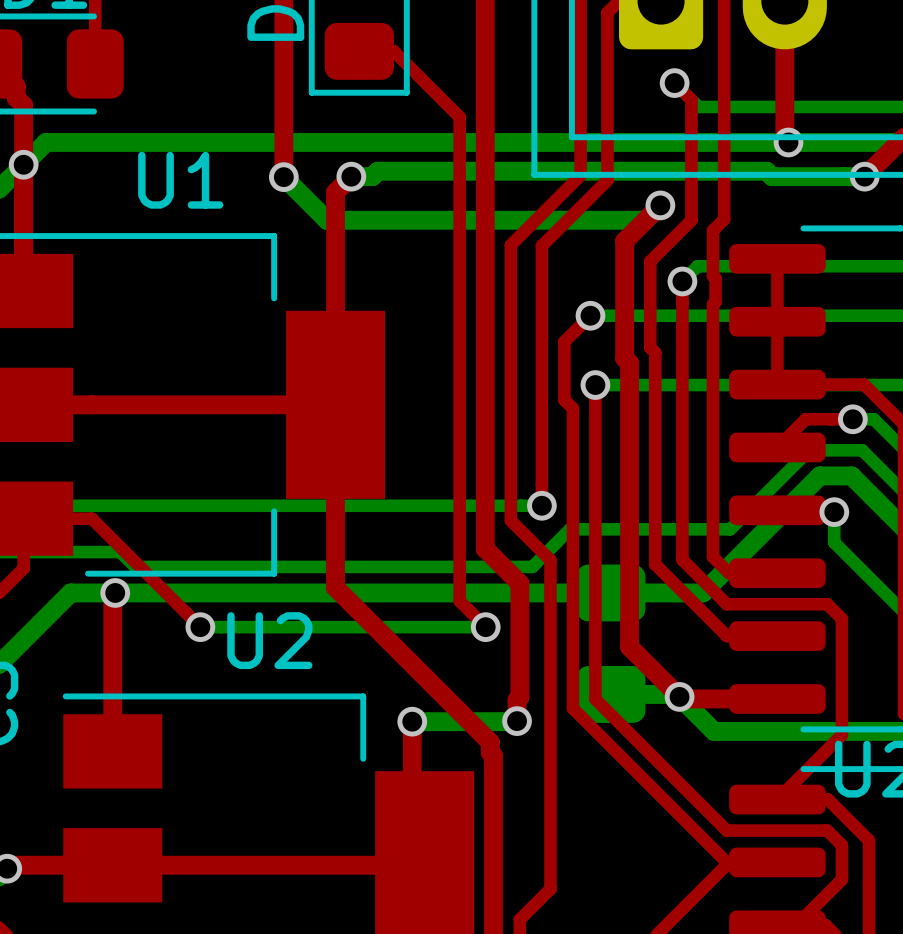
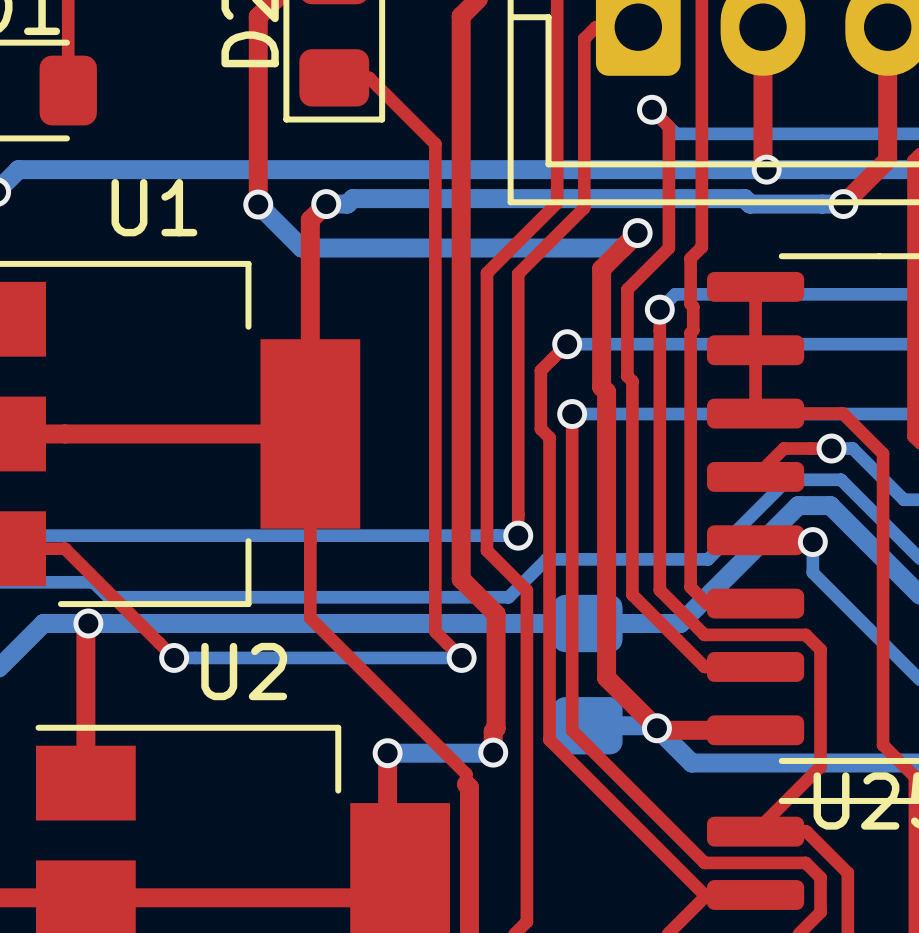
top track width: thick (335, 404) (335, 587) (490, 742) (490, 752) -> thin (310, 433) (310, 618) (466, 774) (466, 784)

